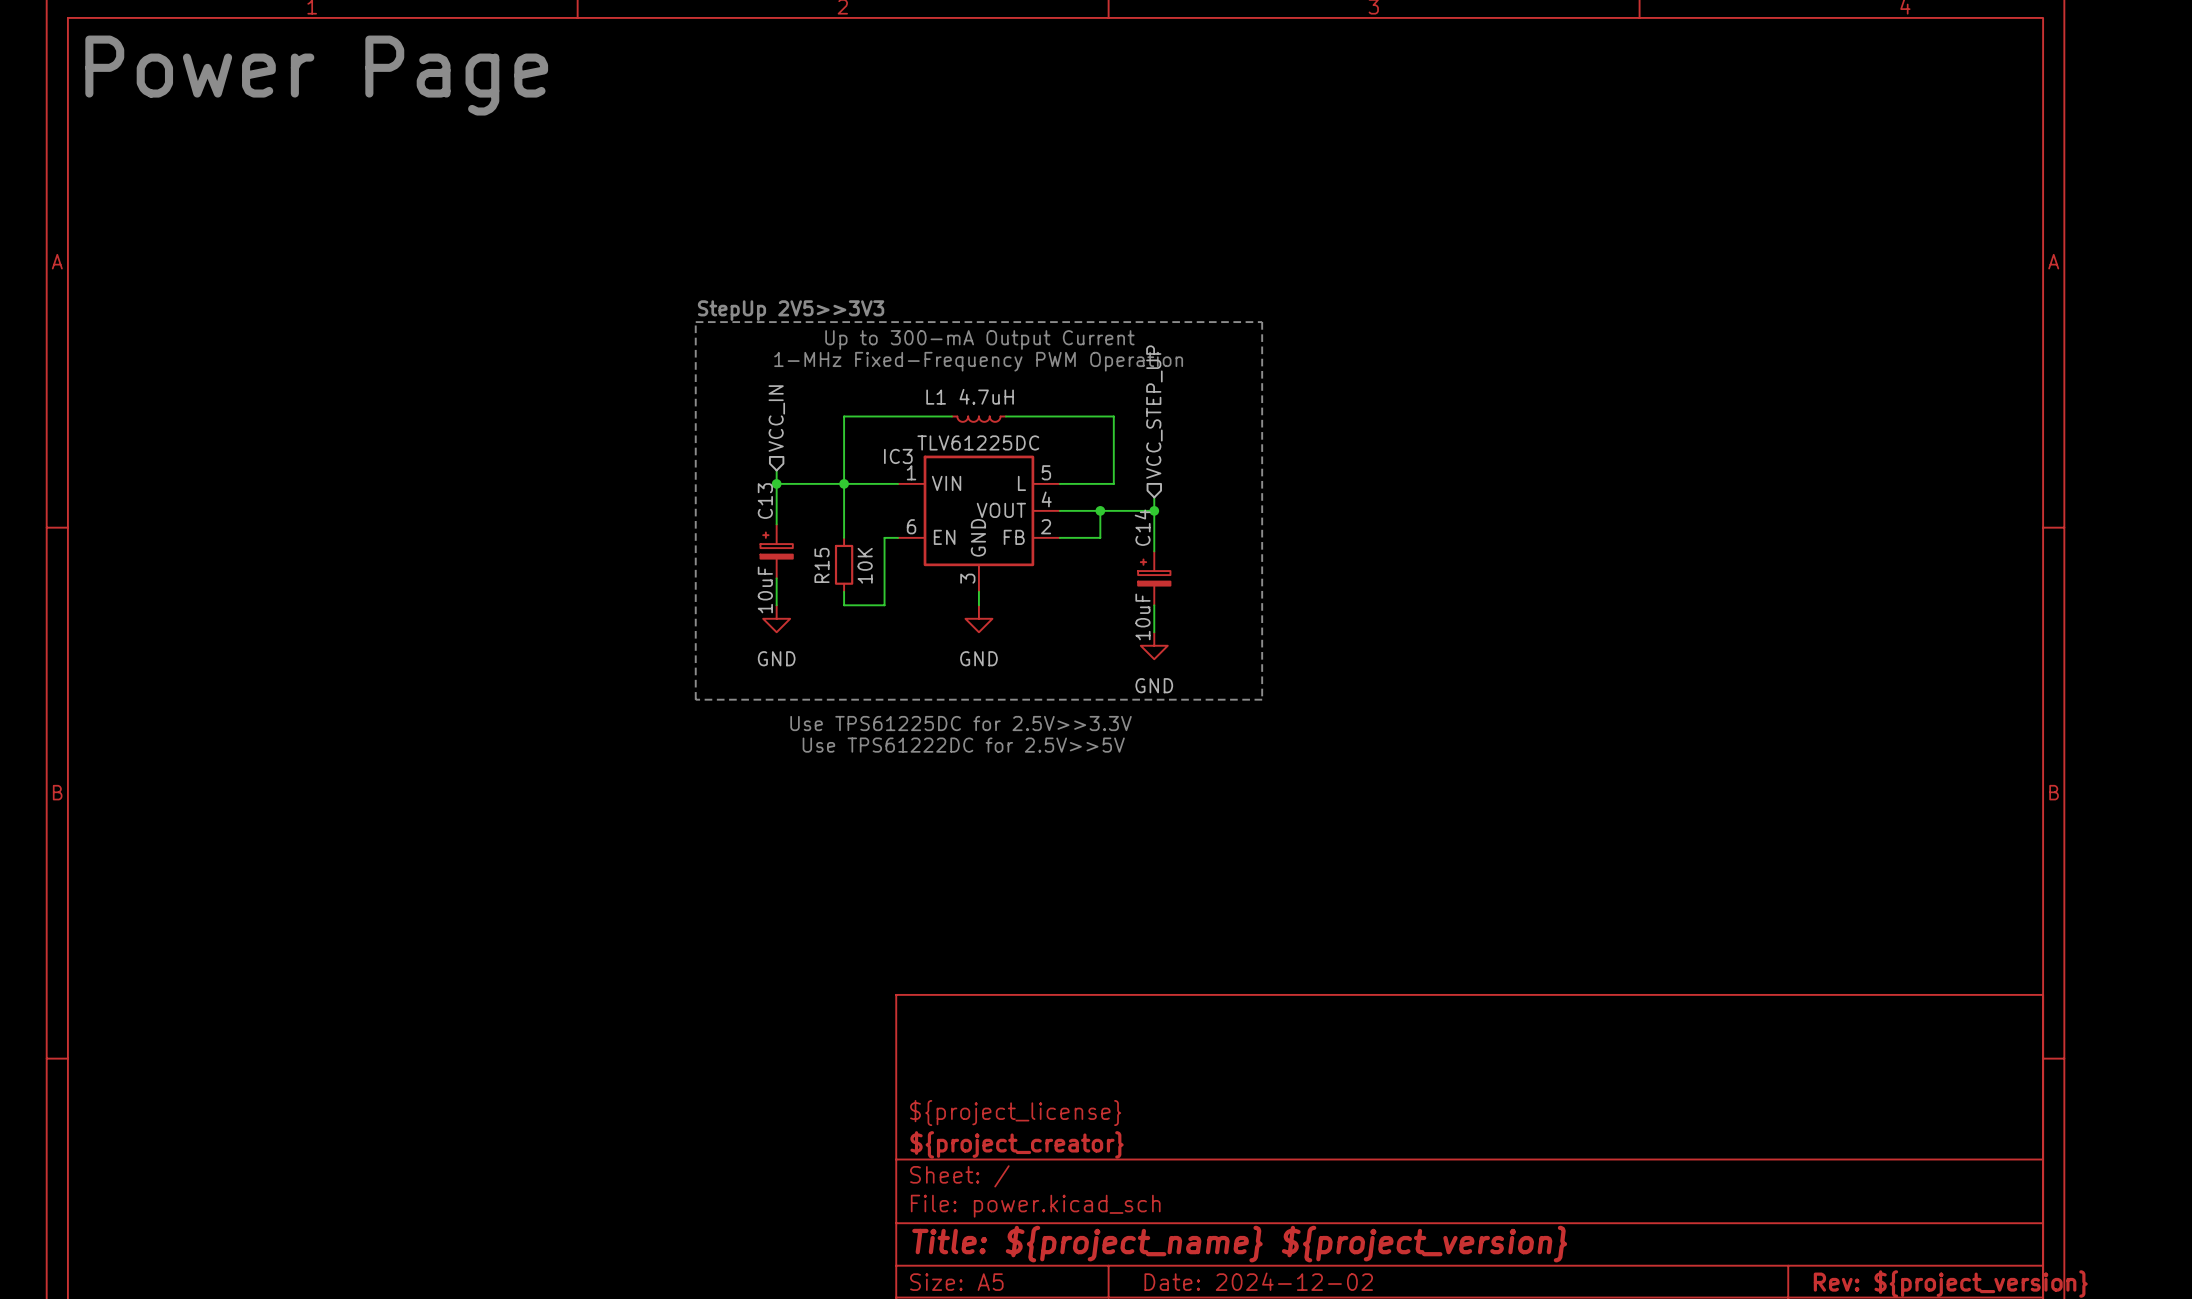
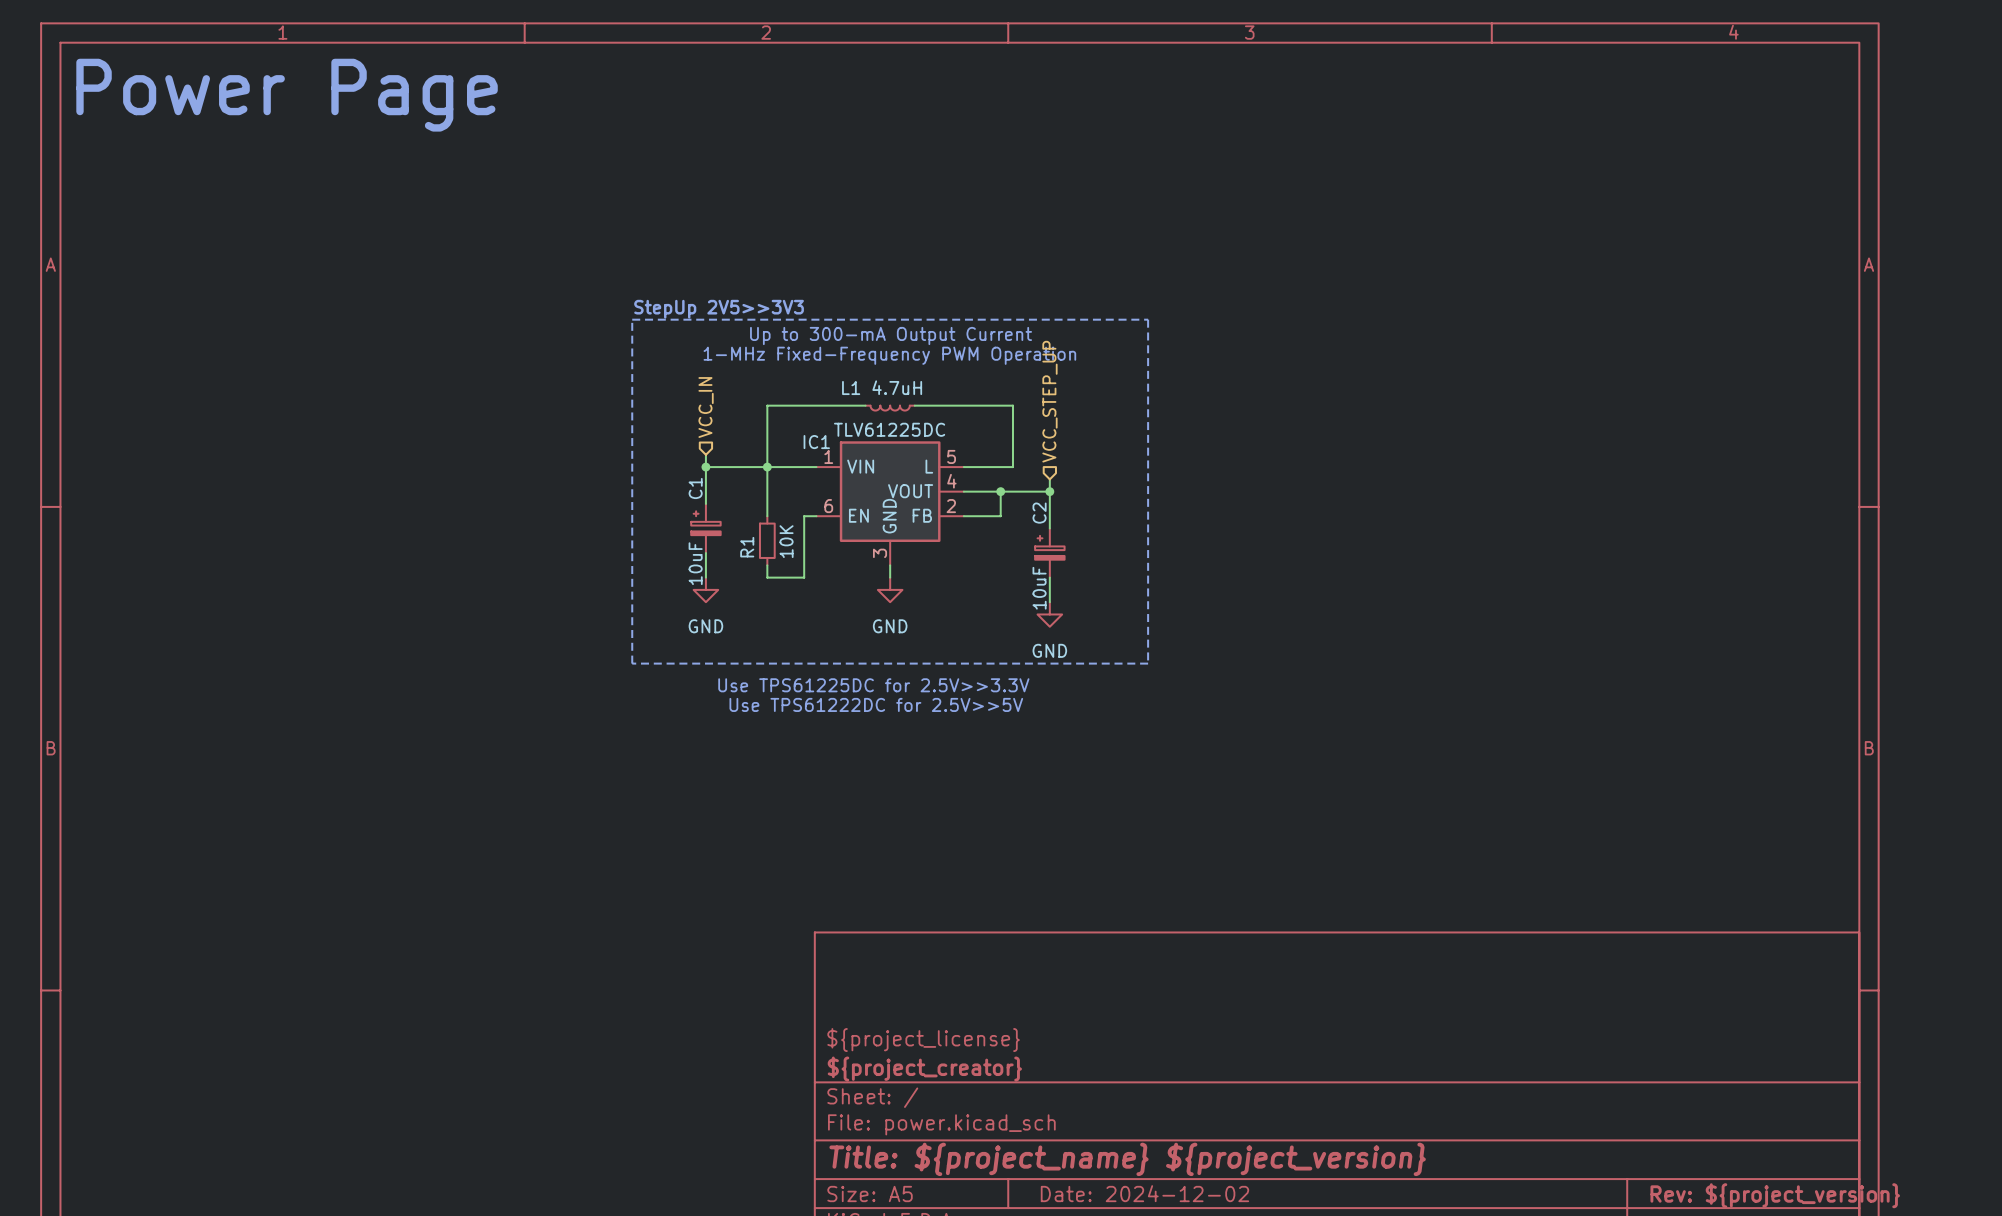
IC3 name: IC3 (898, 456) -> IC1 (816, 442)
C13 name: C13 (765, 501) -> C1 (695, 488)
C14 name: C14 (1142, 527) -> C2 (1039, 513)
R15 name: R15 (822, 565) -> R1 (747, 547)

